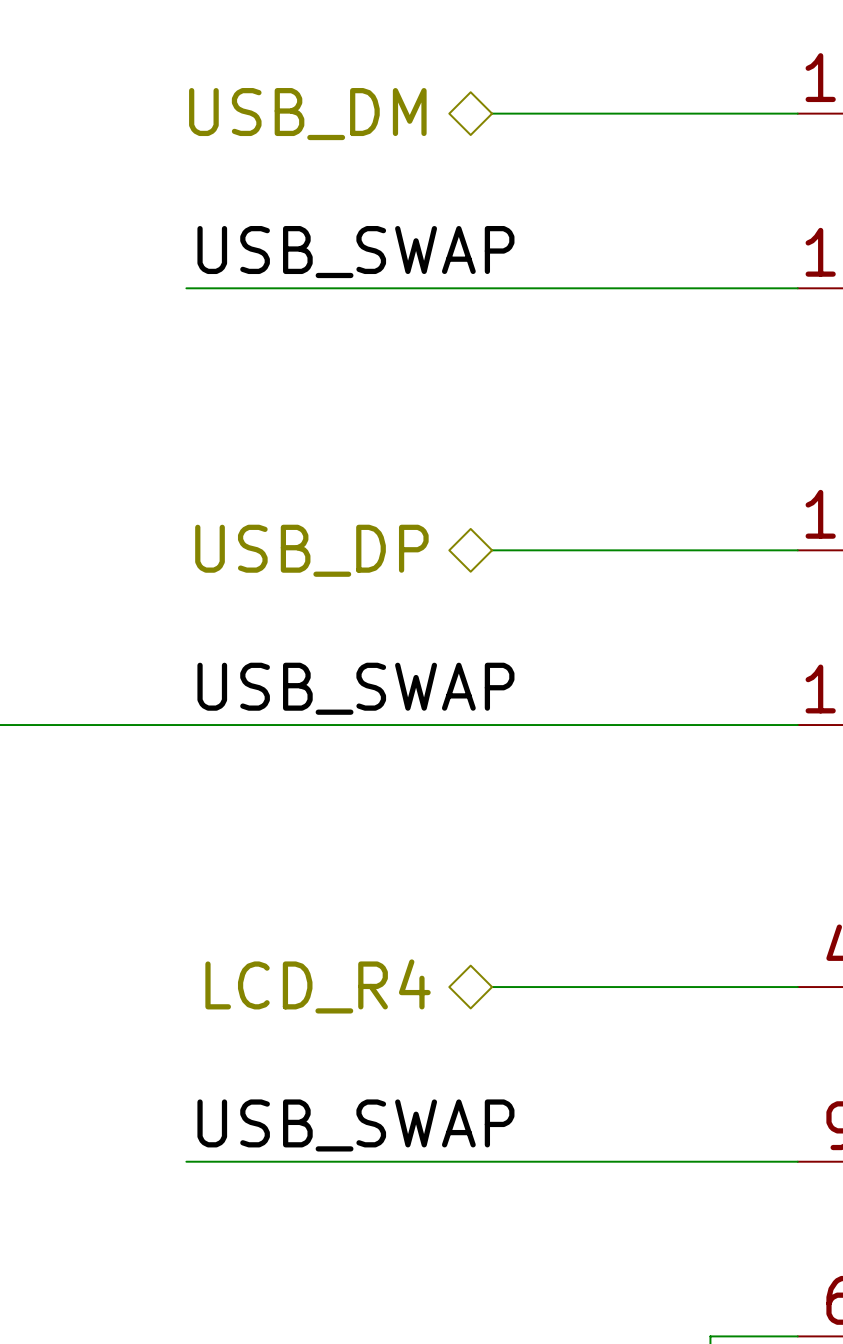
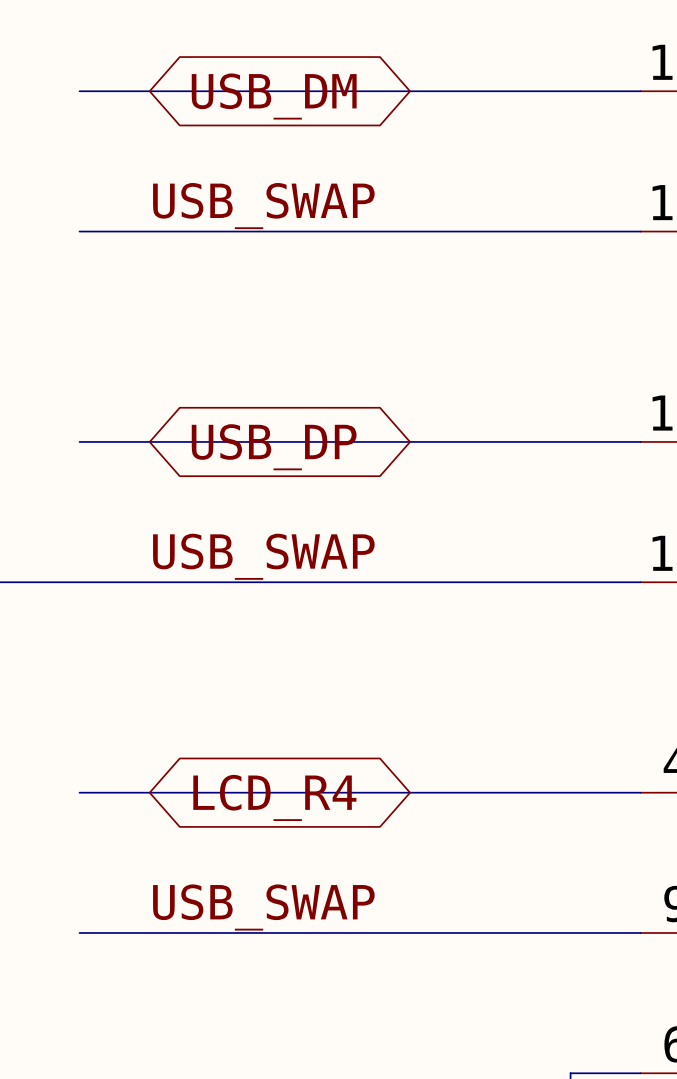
wire: none -> (79, 91) (395, 91)
hierarchical label: USB_DM (307, 114) -> none
global label: none -> USB_DM (274, 96)
wire: none -> (79, 231) (149, 231)
wire: none -> (79, 441) (395, 441)
hierarchical label: USB_DP (311, 550) -> none
global label: none -> USB_DP (274, 447)
hierarchical label: LCD_R4 (318, 986) -> none
wire: none -> (79, 792) (395, 792)
global label: none -> LCD_R4 (274, 797)
wire: none -> (79, 932) (149, 932)

